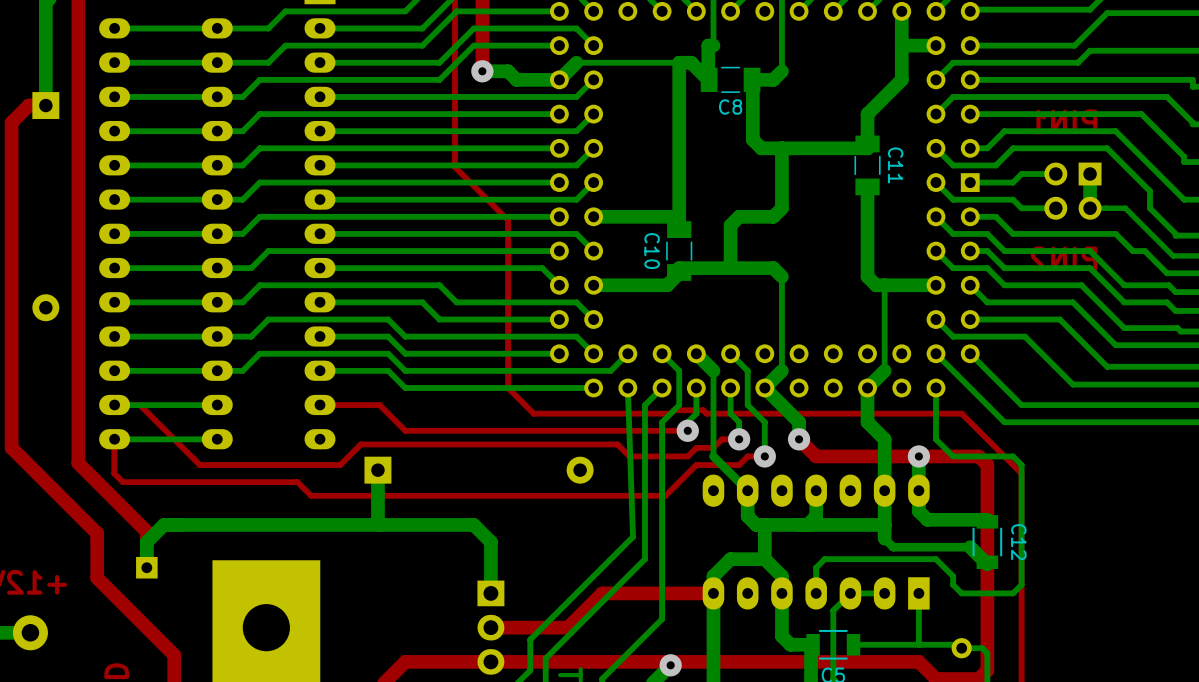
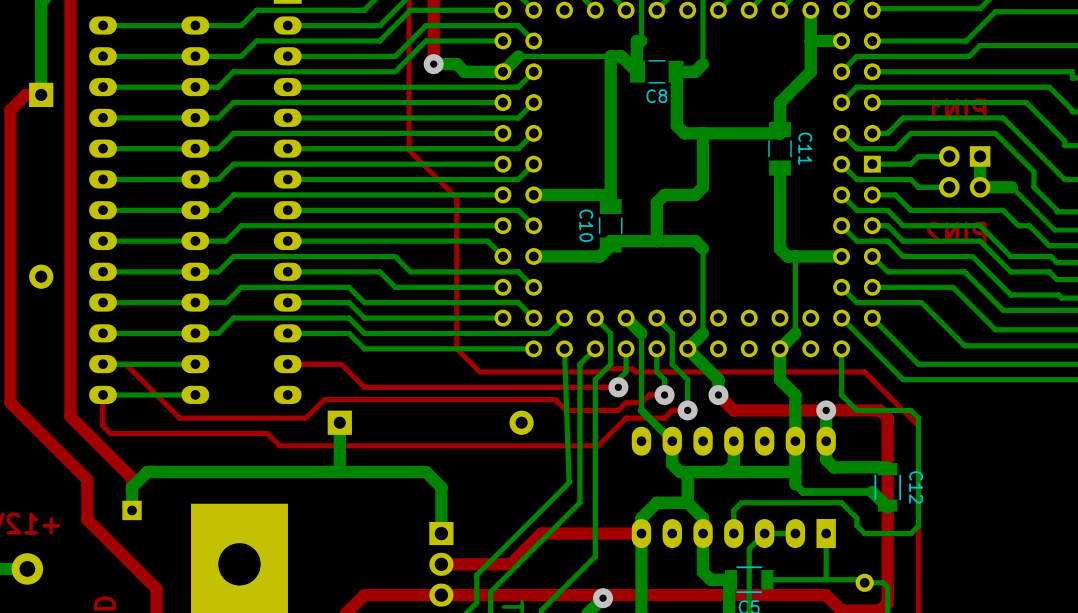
bottom track width: thin (1125, 208) (1090, 208) -> thick (1011, 187) (980, 187)

